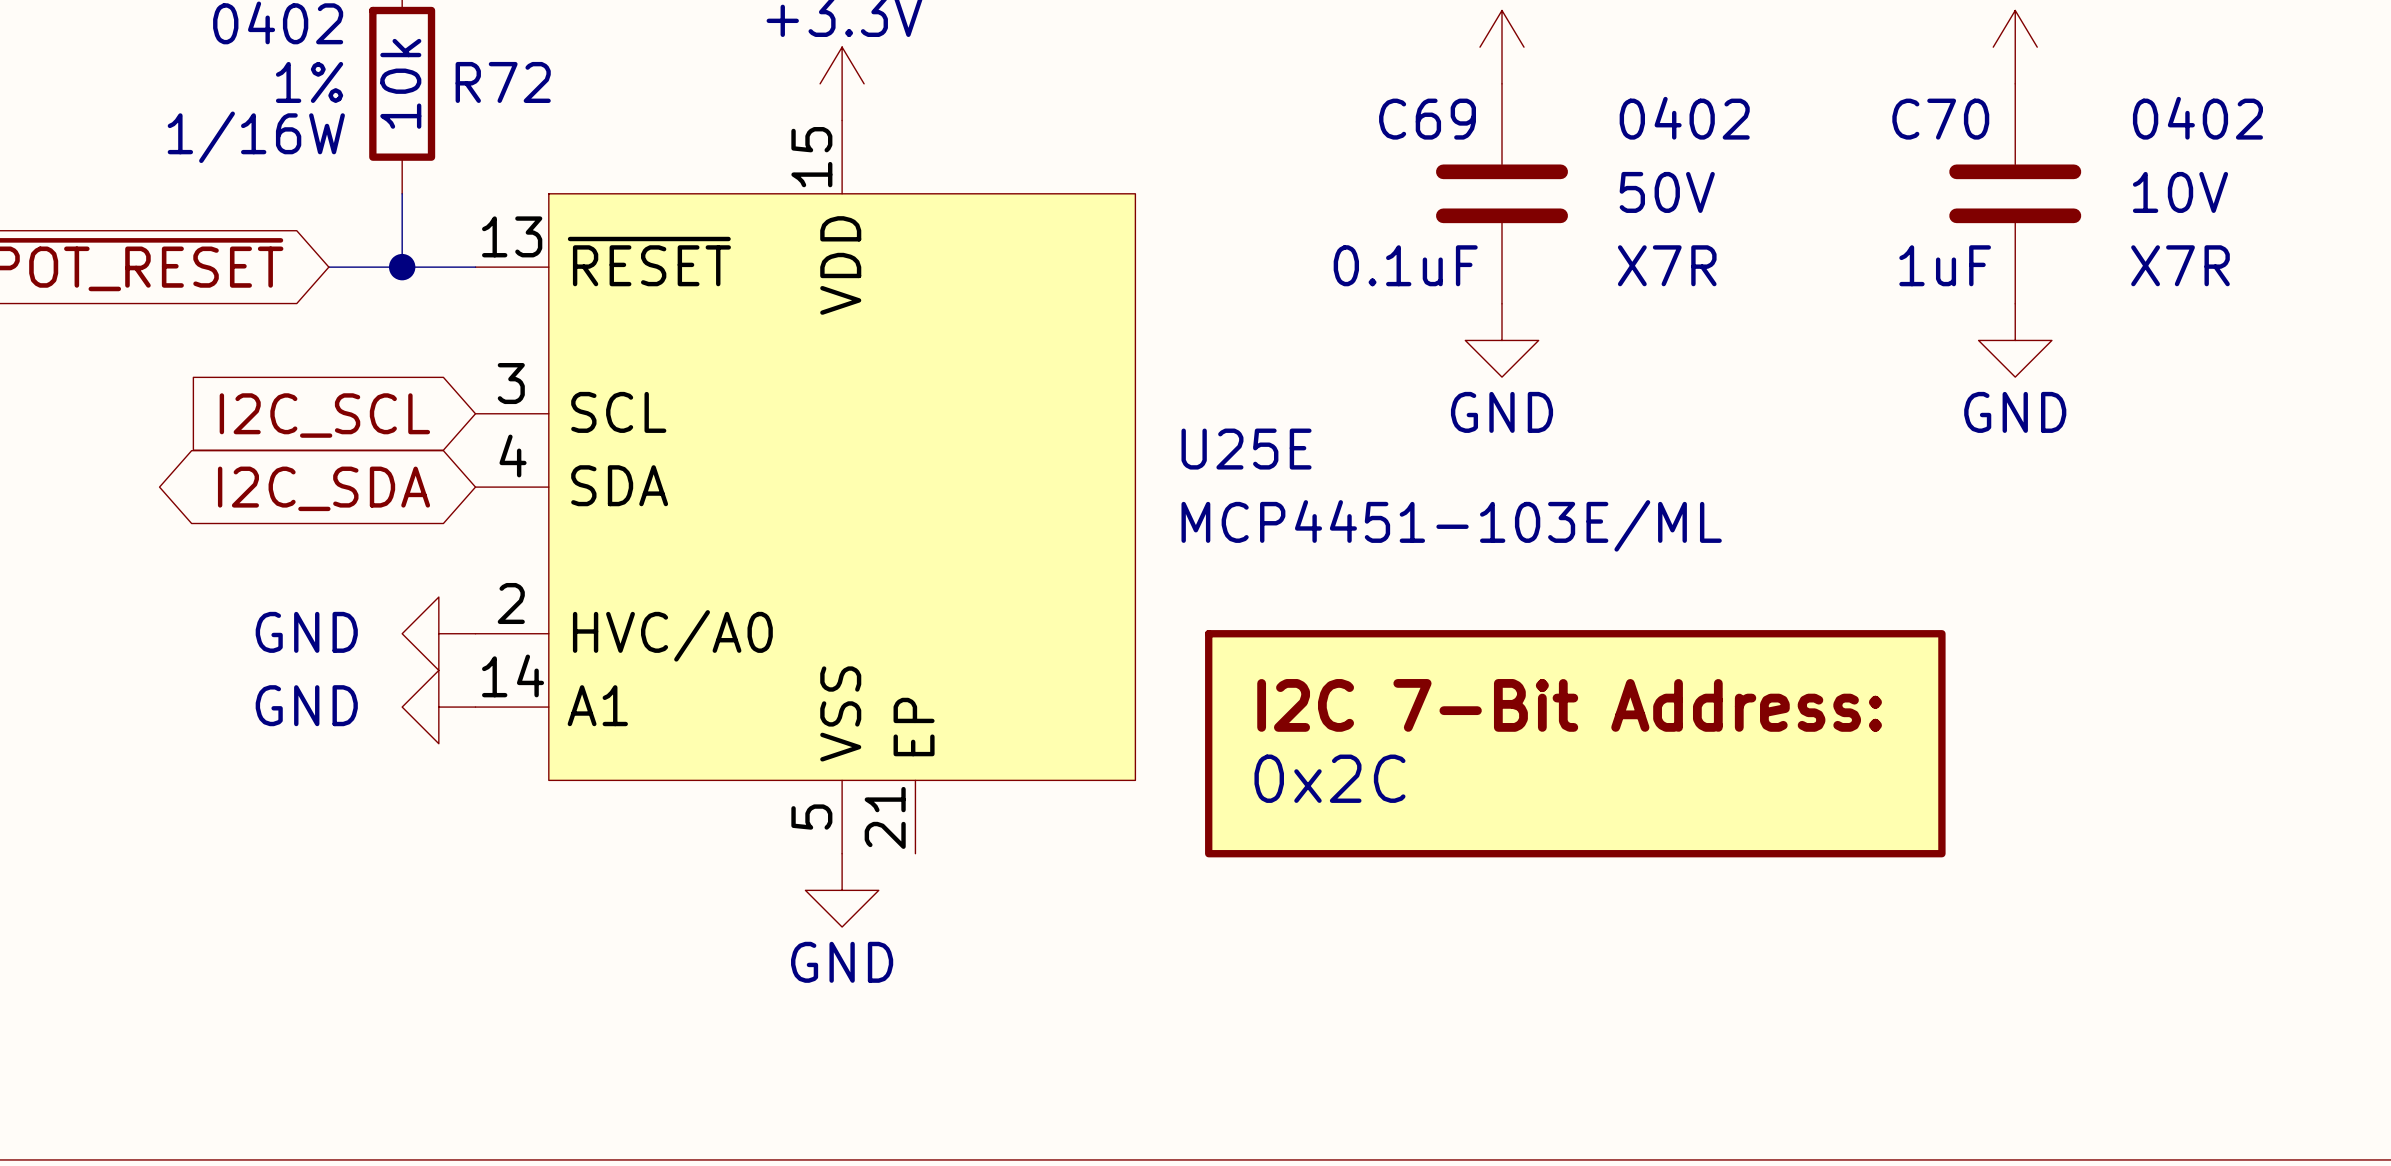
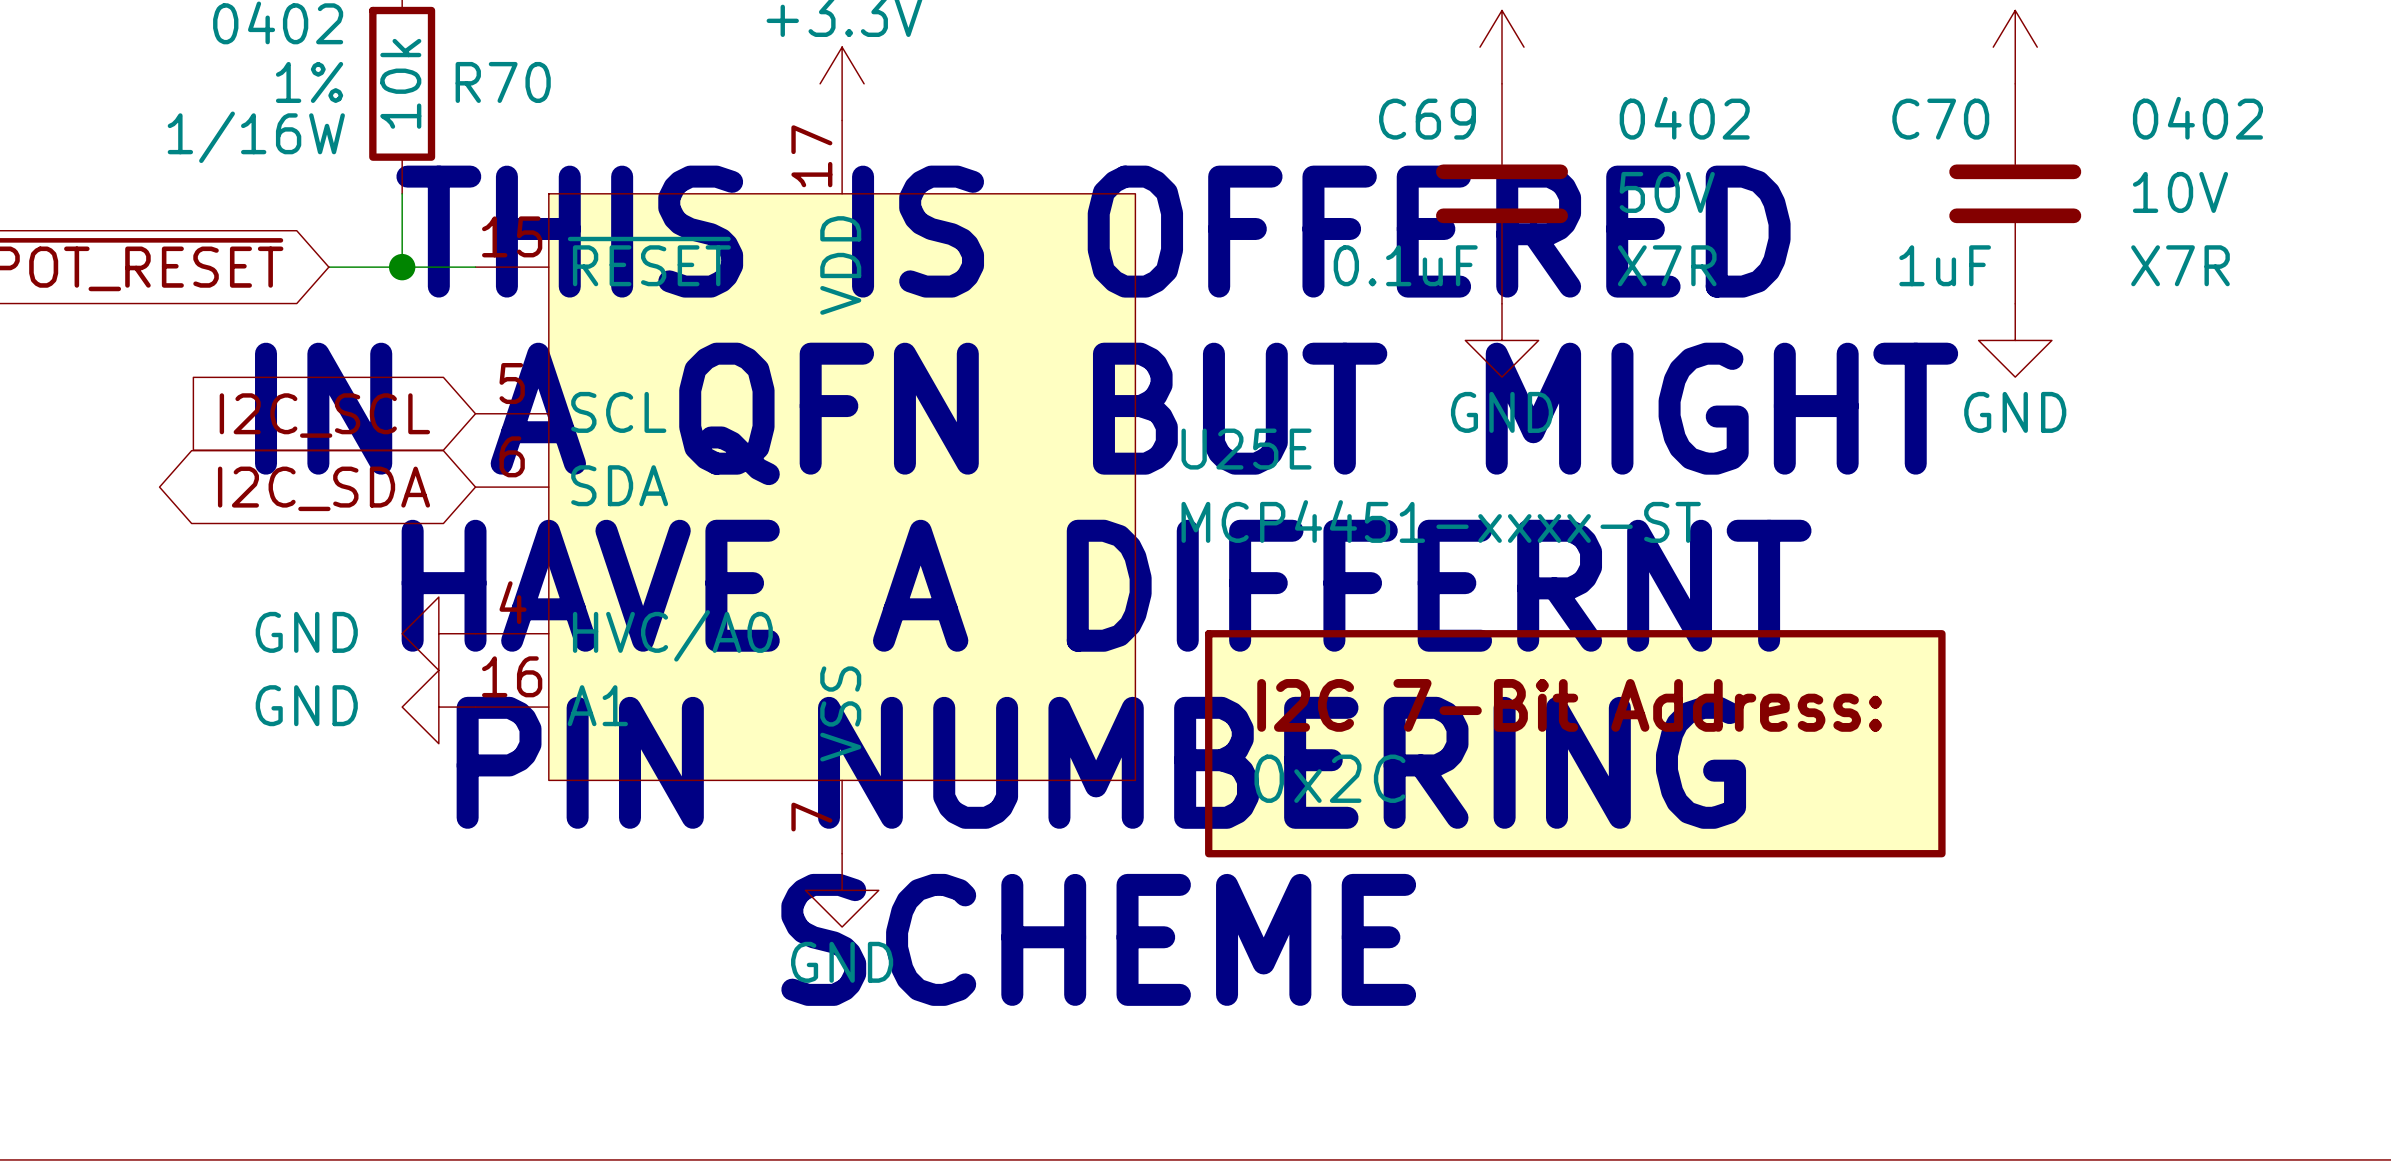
R72 name: R72 (503, 82) -> R70 (503, 82)
U25E symbol: [475, 120, 1136, 854] -> [475, 120, 1136, 854]
text: none -> THIS IS OFFERED (1093, 231)
text: none -> IN A QFN BUT MIGHT (1106, 413)
U25E value: MCP4451-103E/ML (1451, 525) -> MCP4451-xxxx-ST (1441, 521)
text: none -> HAVE A DIFFERNT (1106, 585)
text: none -> PIN NUMBERING (1101, 762)
text: none -> SCHEME (1098, 939)

